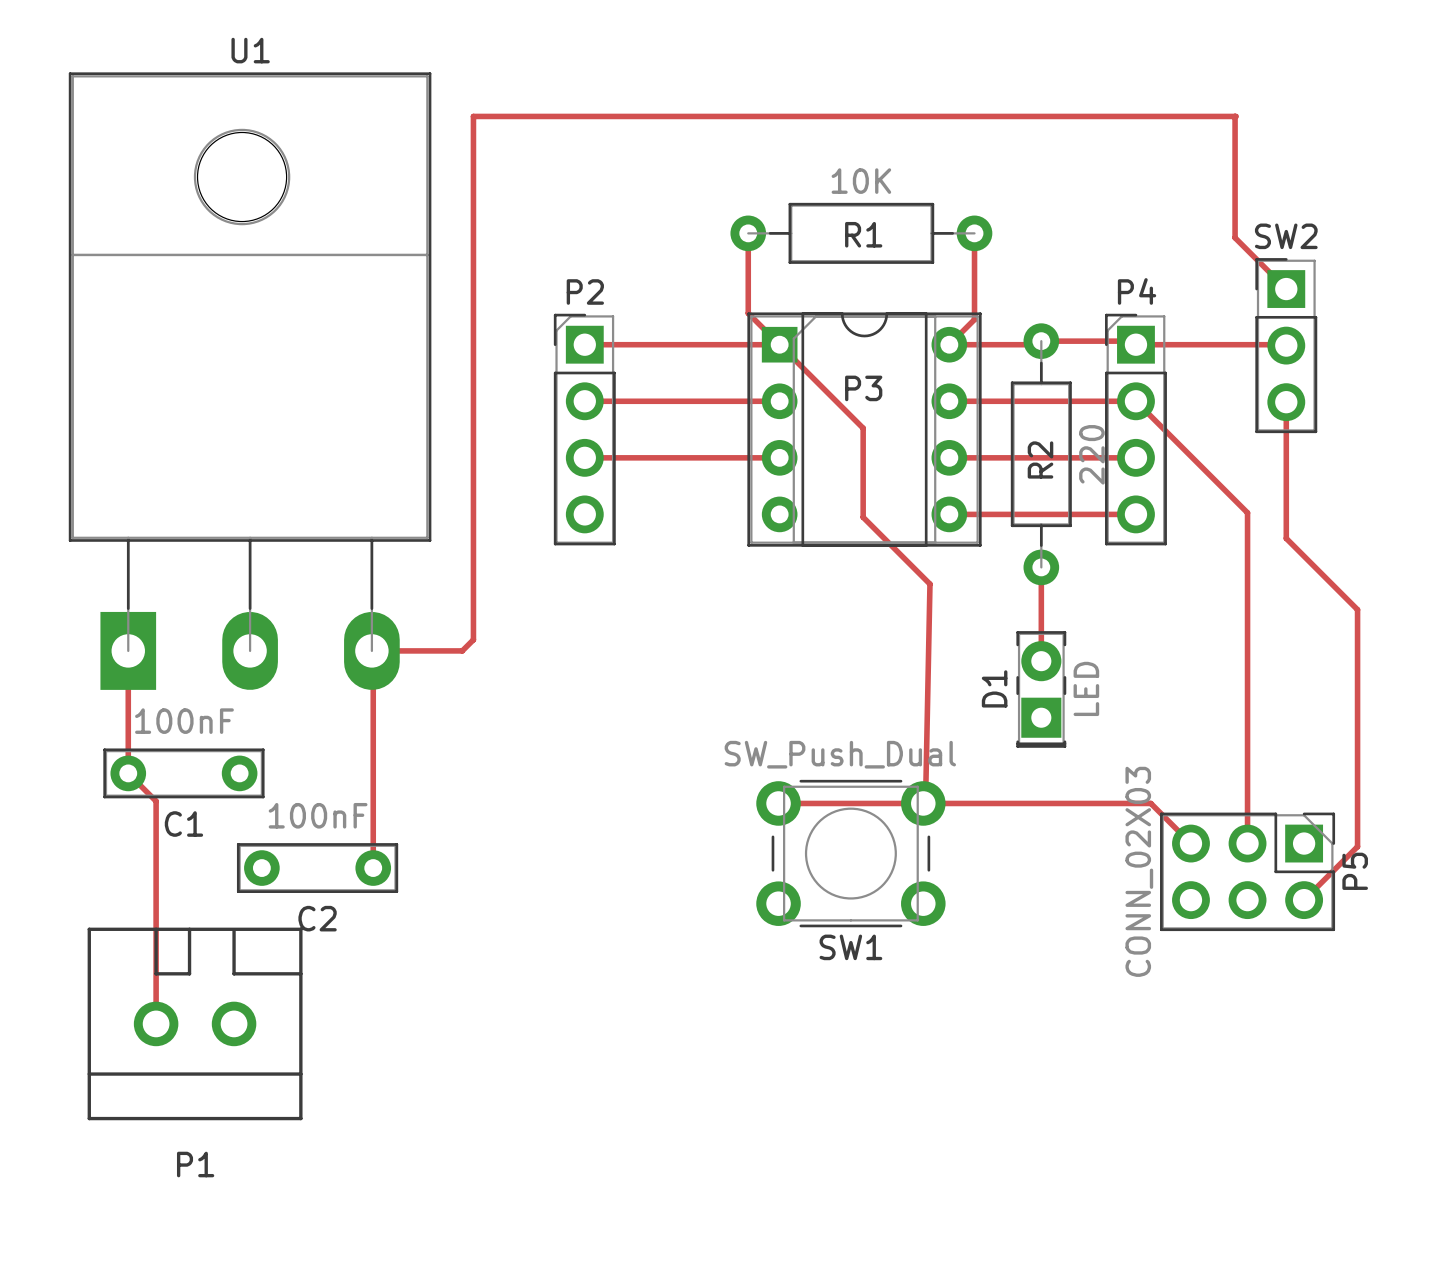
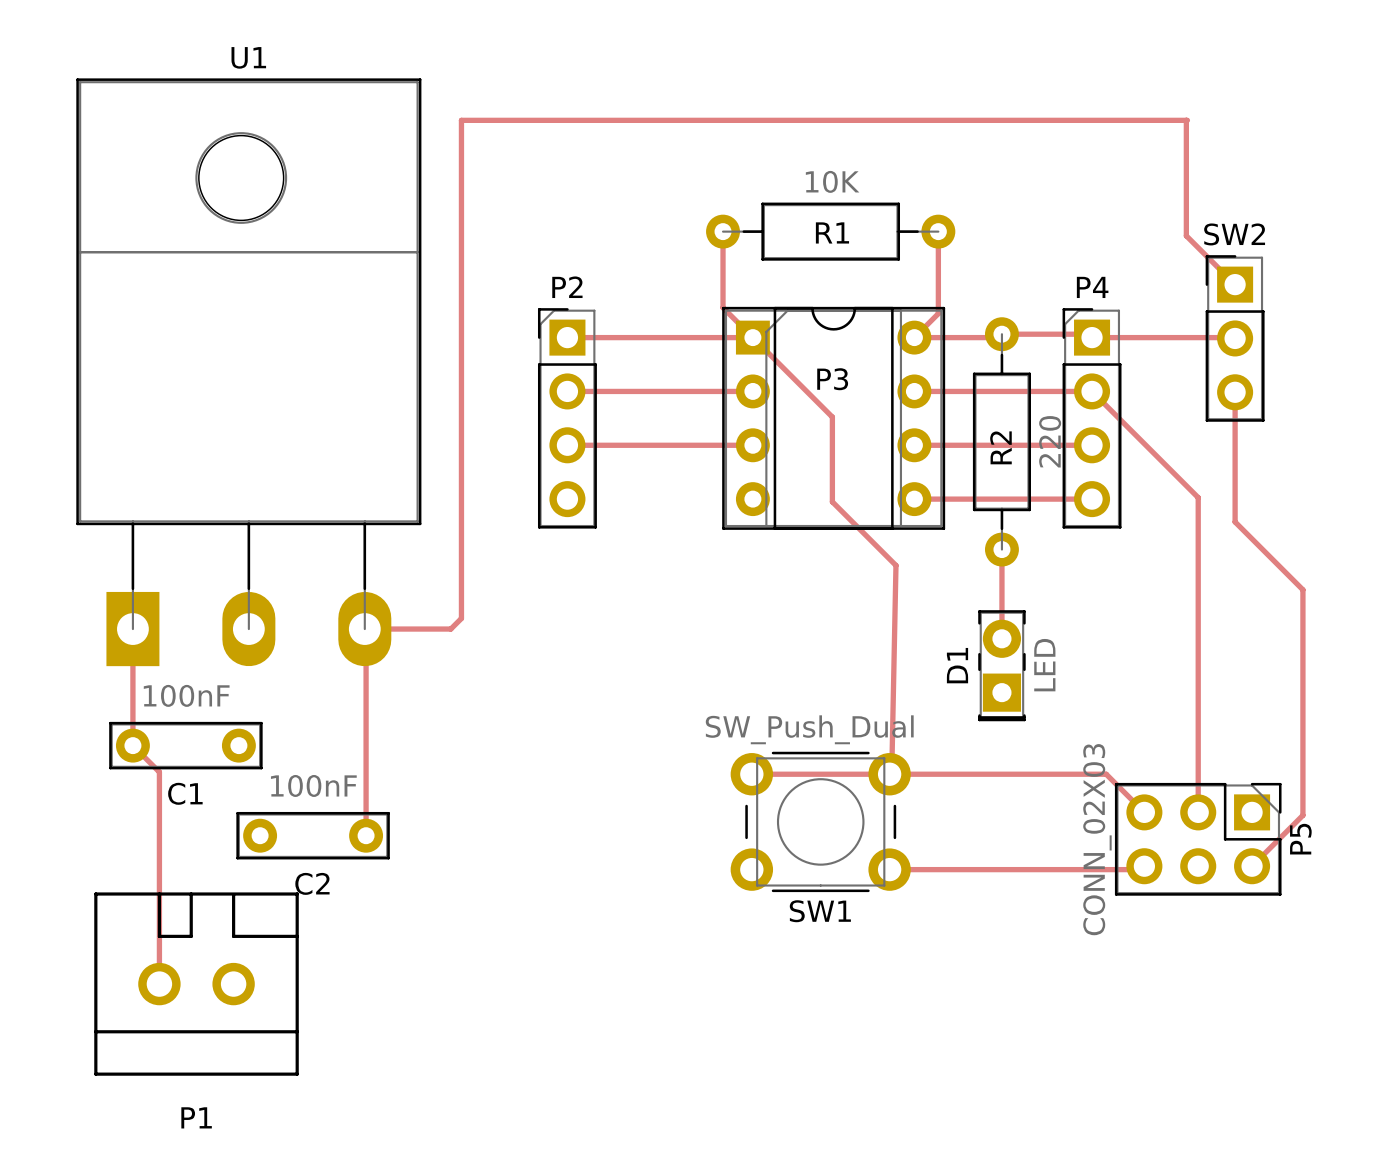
track: none -> (1144, 866) (1141, 869) (889, 869)

